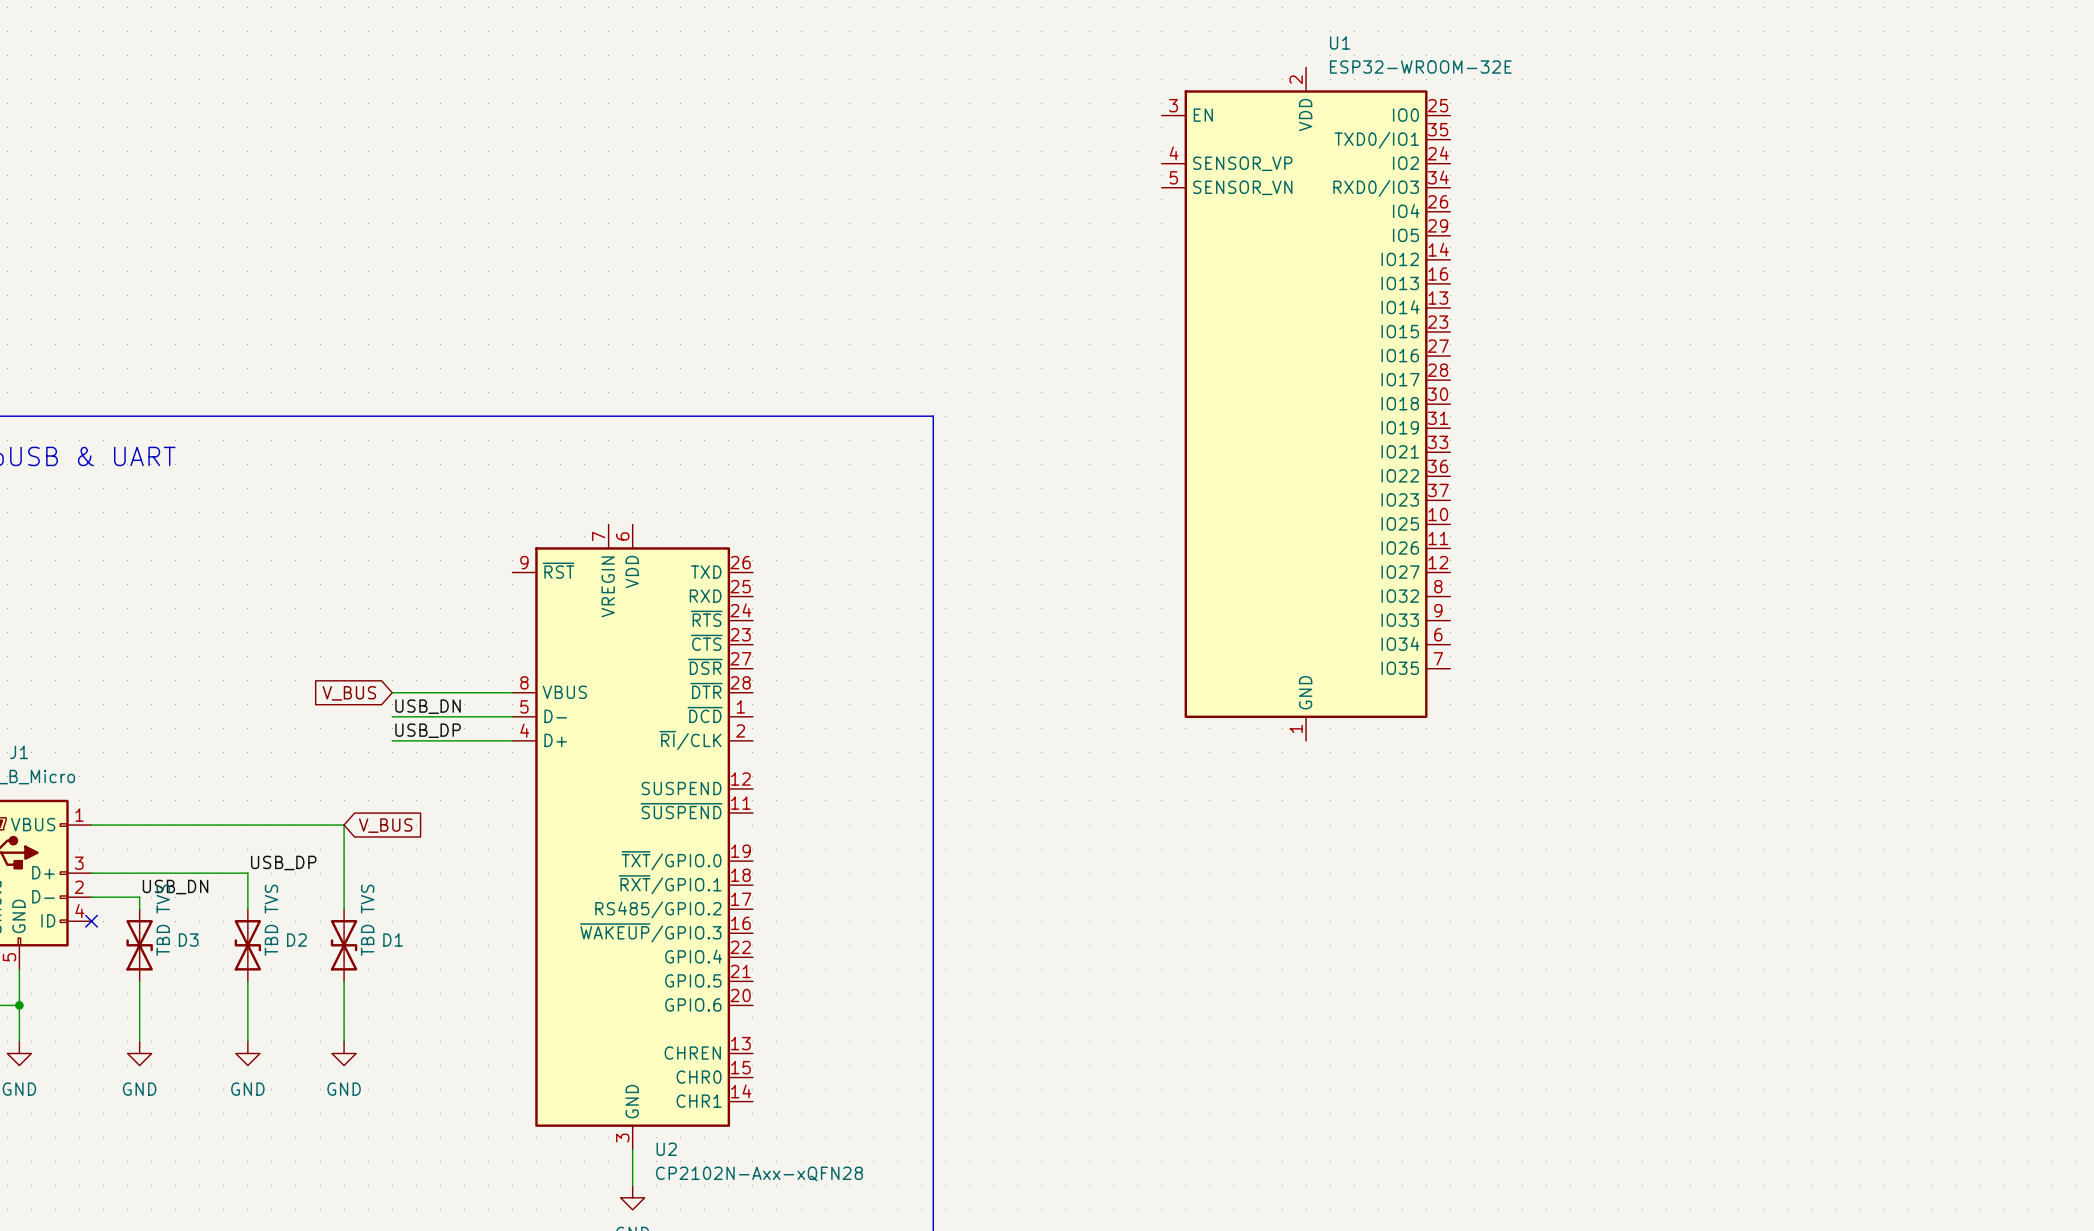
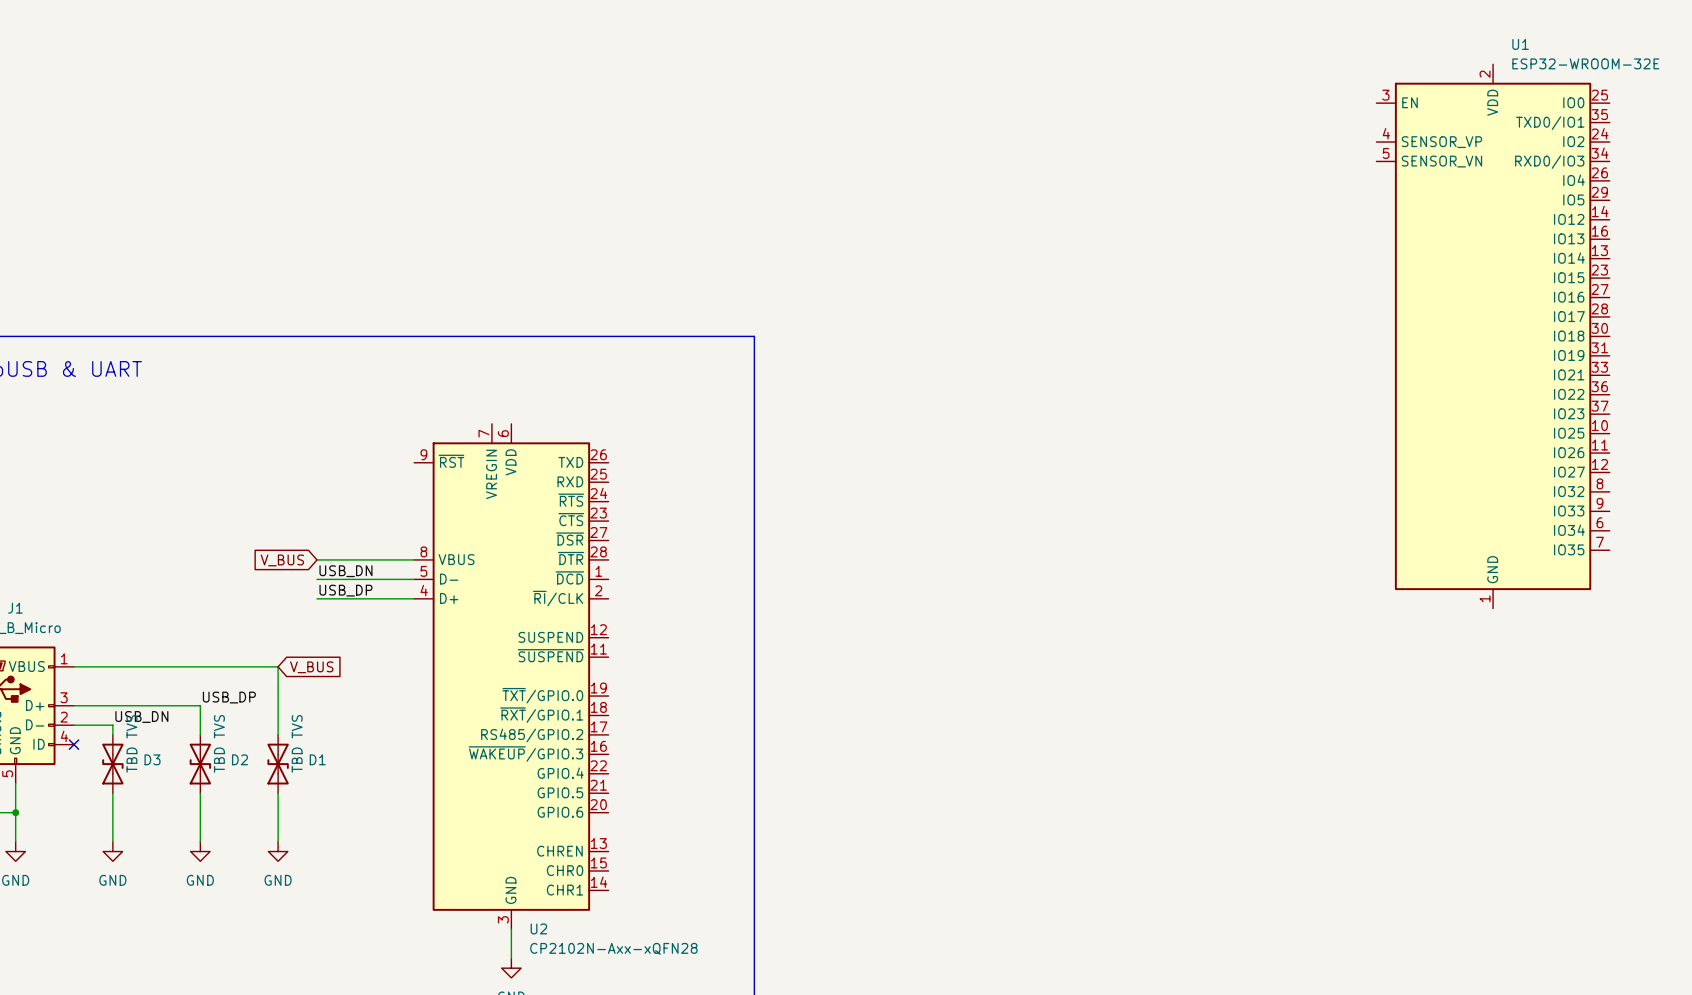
U1 position: (1306, 404) -> (1493, 336)

